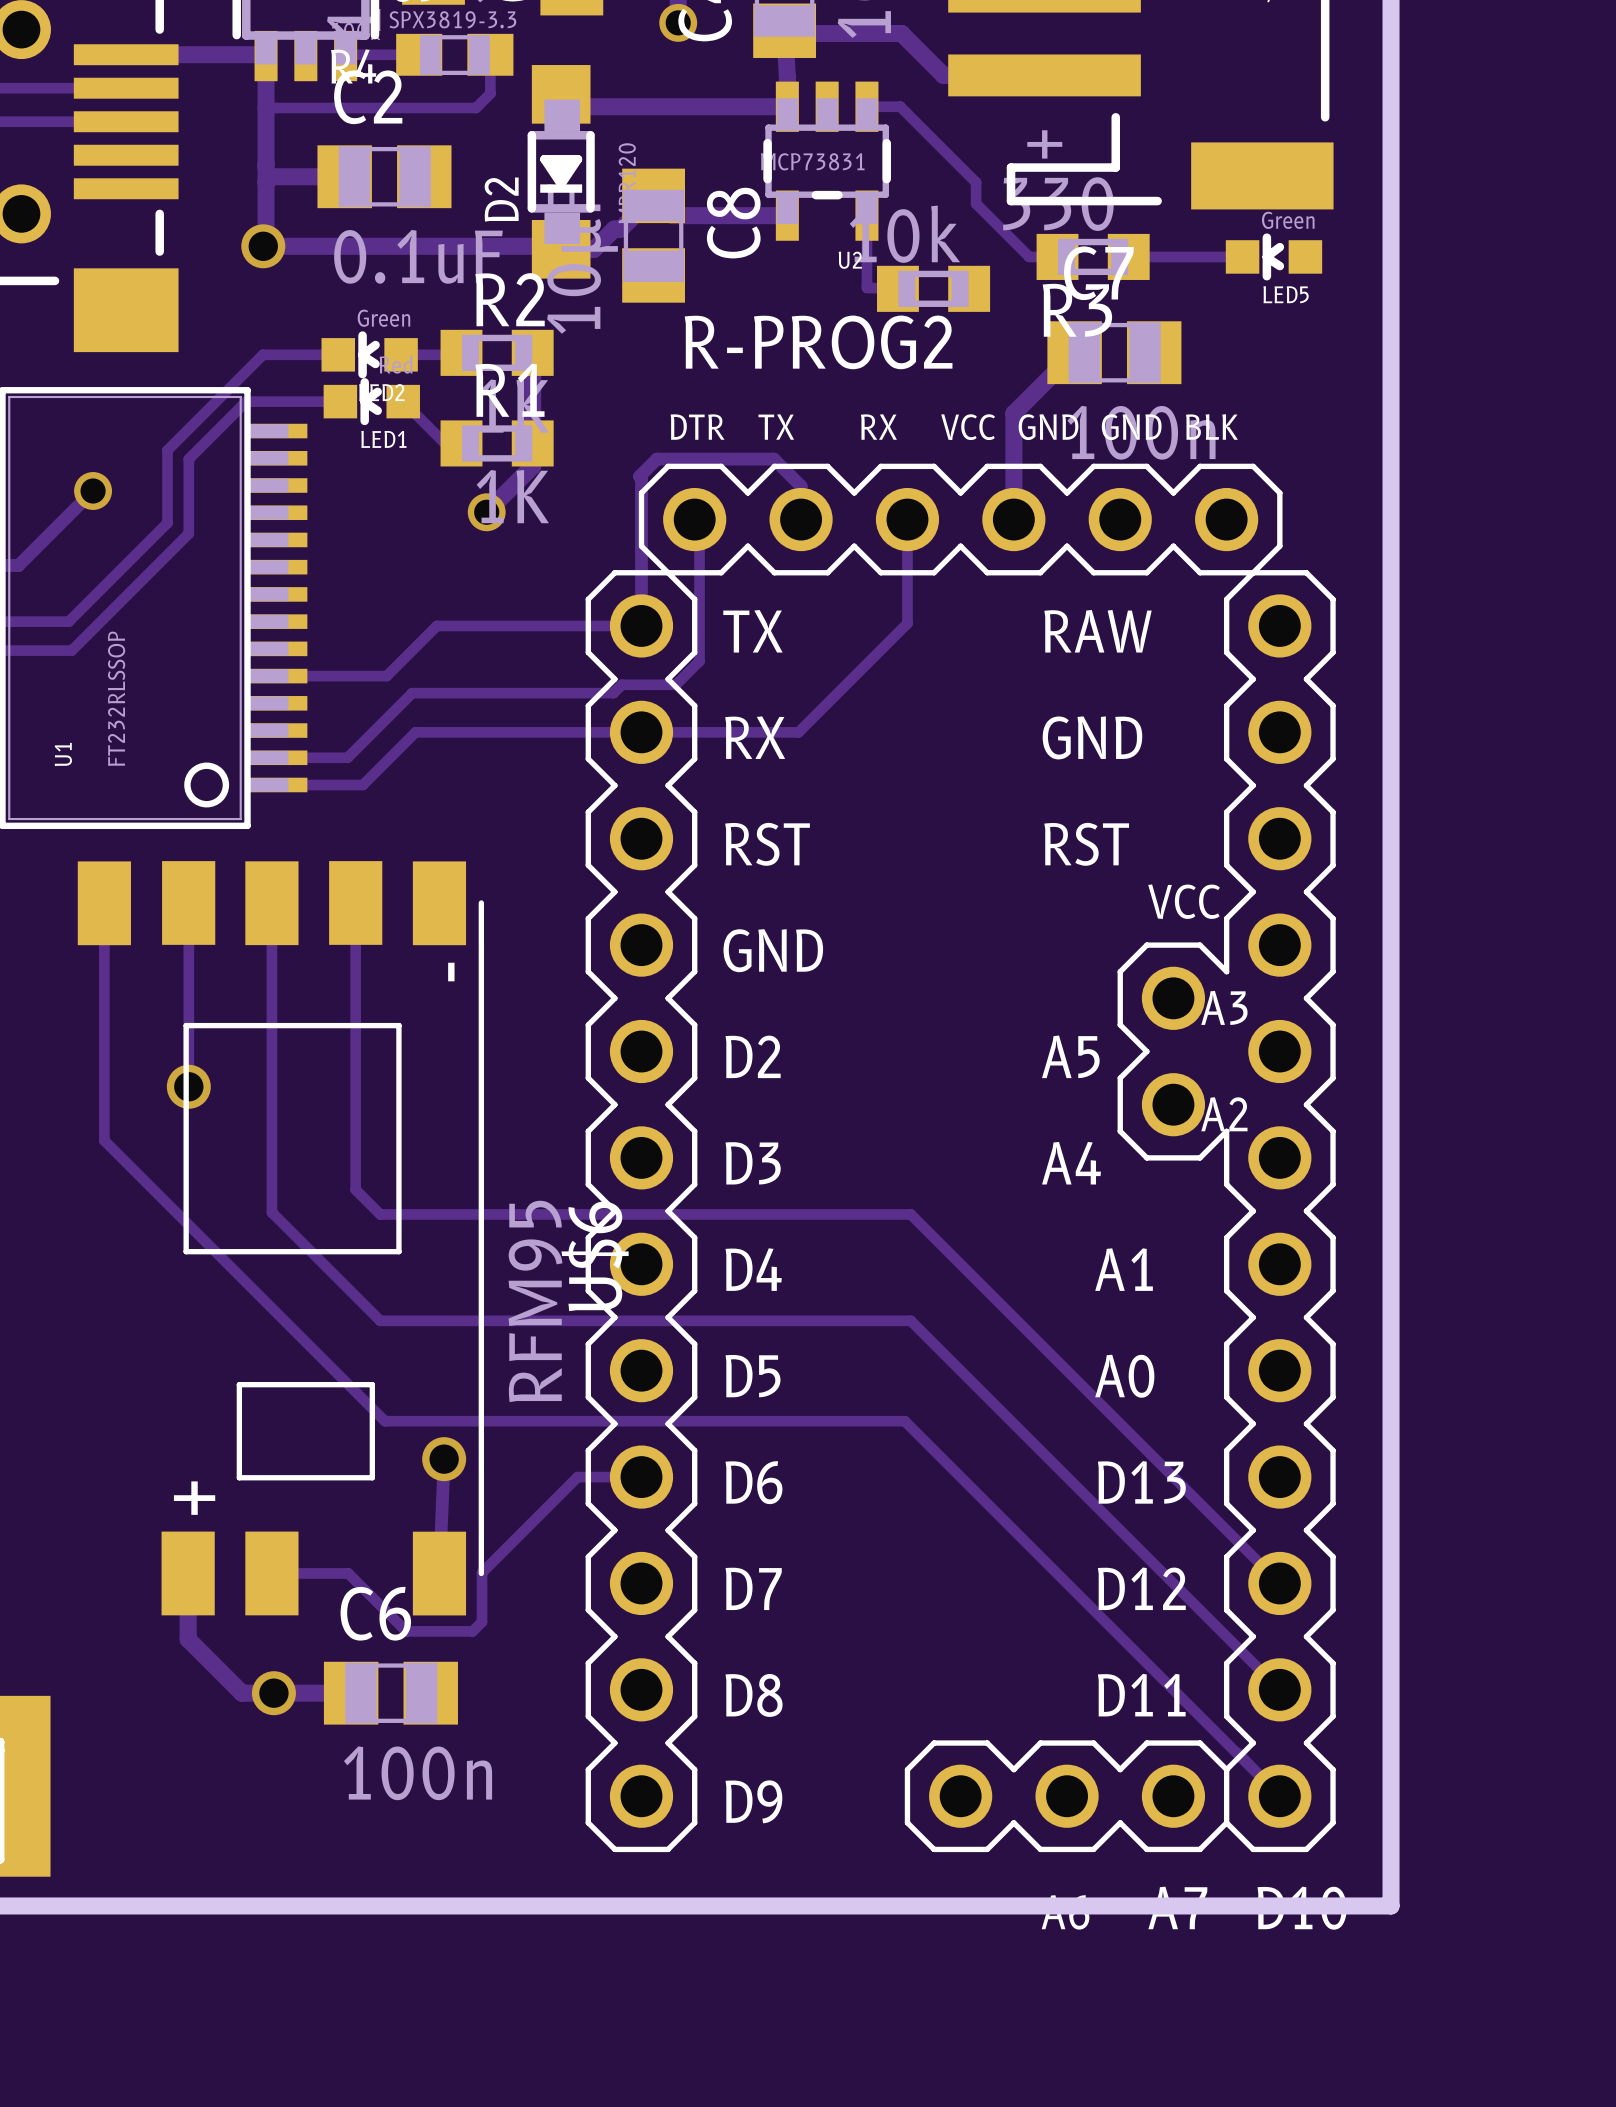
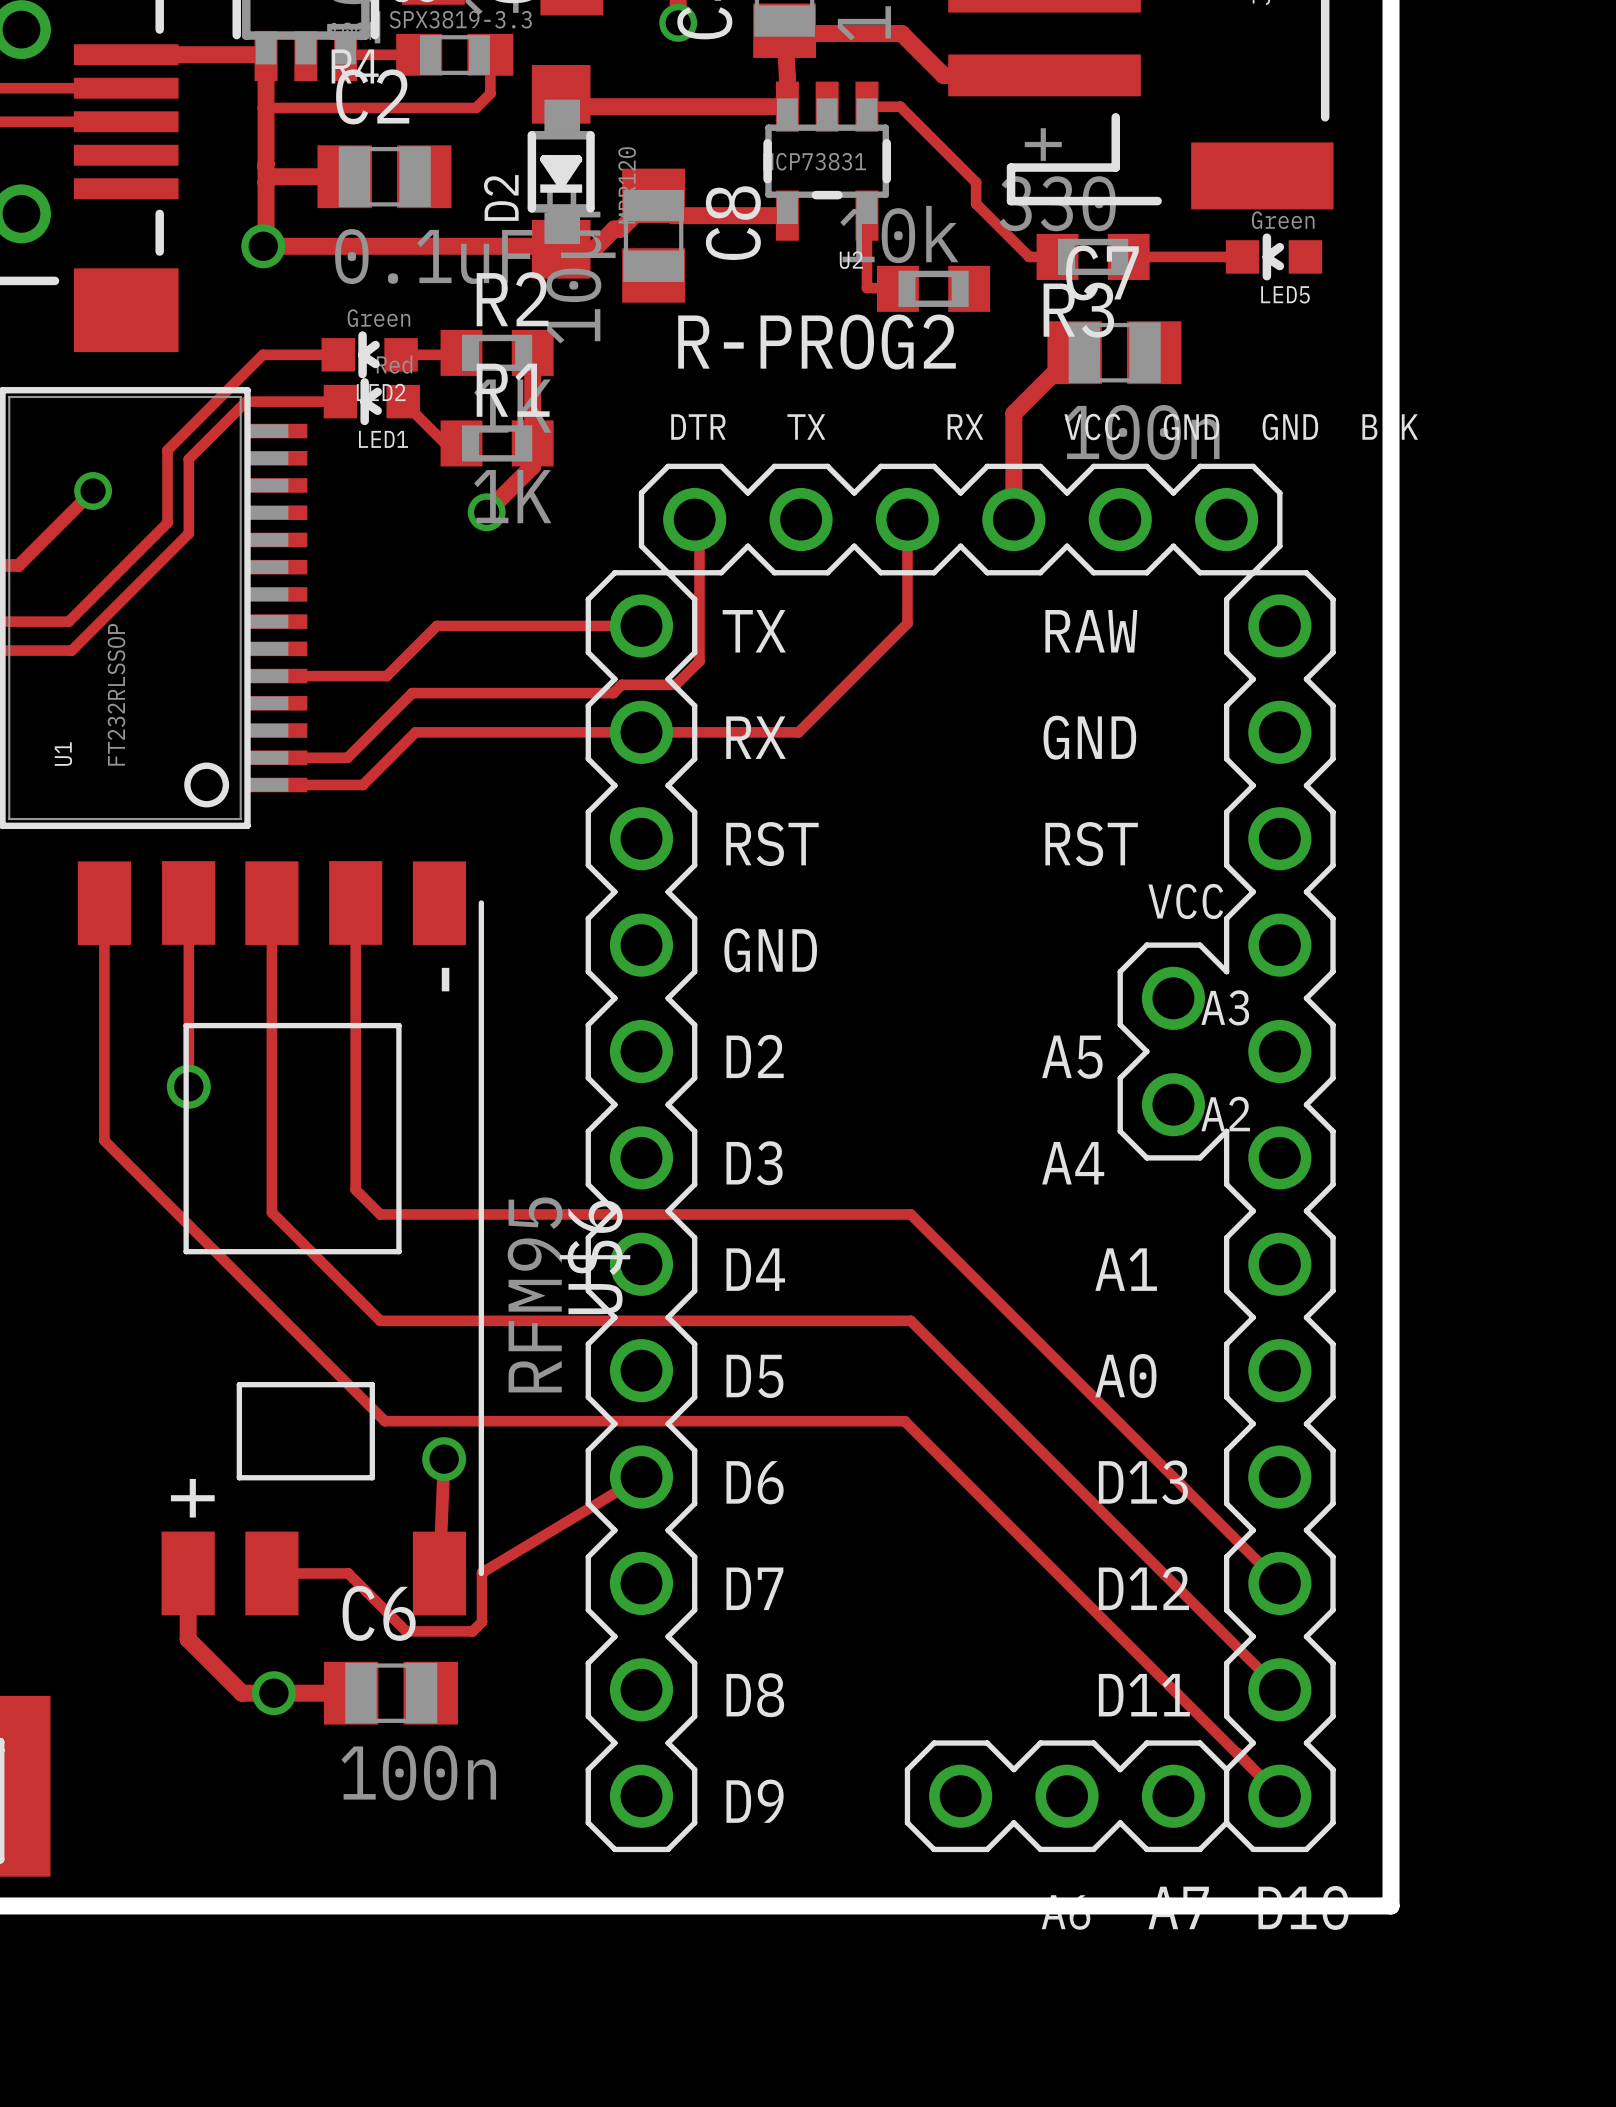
track: (801, 519) (801, 486) (773, 459) (656, 459) (639, 476) (641, 478) (641, 625) -> none
track: (641, 1477) (577, 1477) (482, 1572) -> (641, 1477) (482, 1572)

